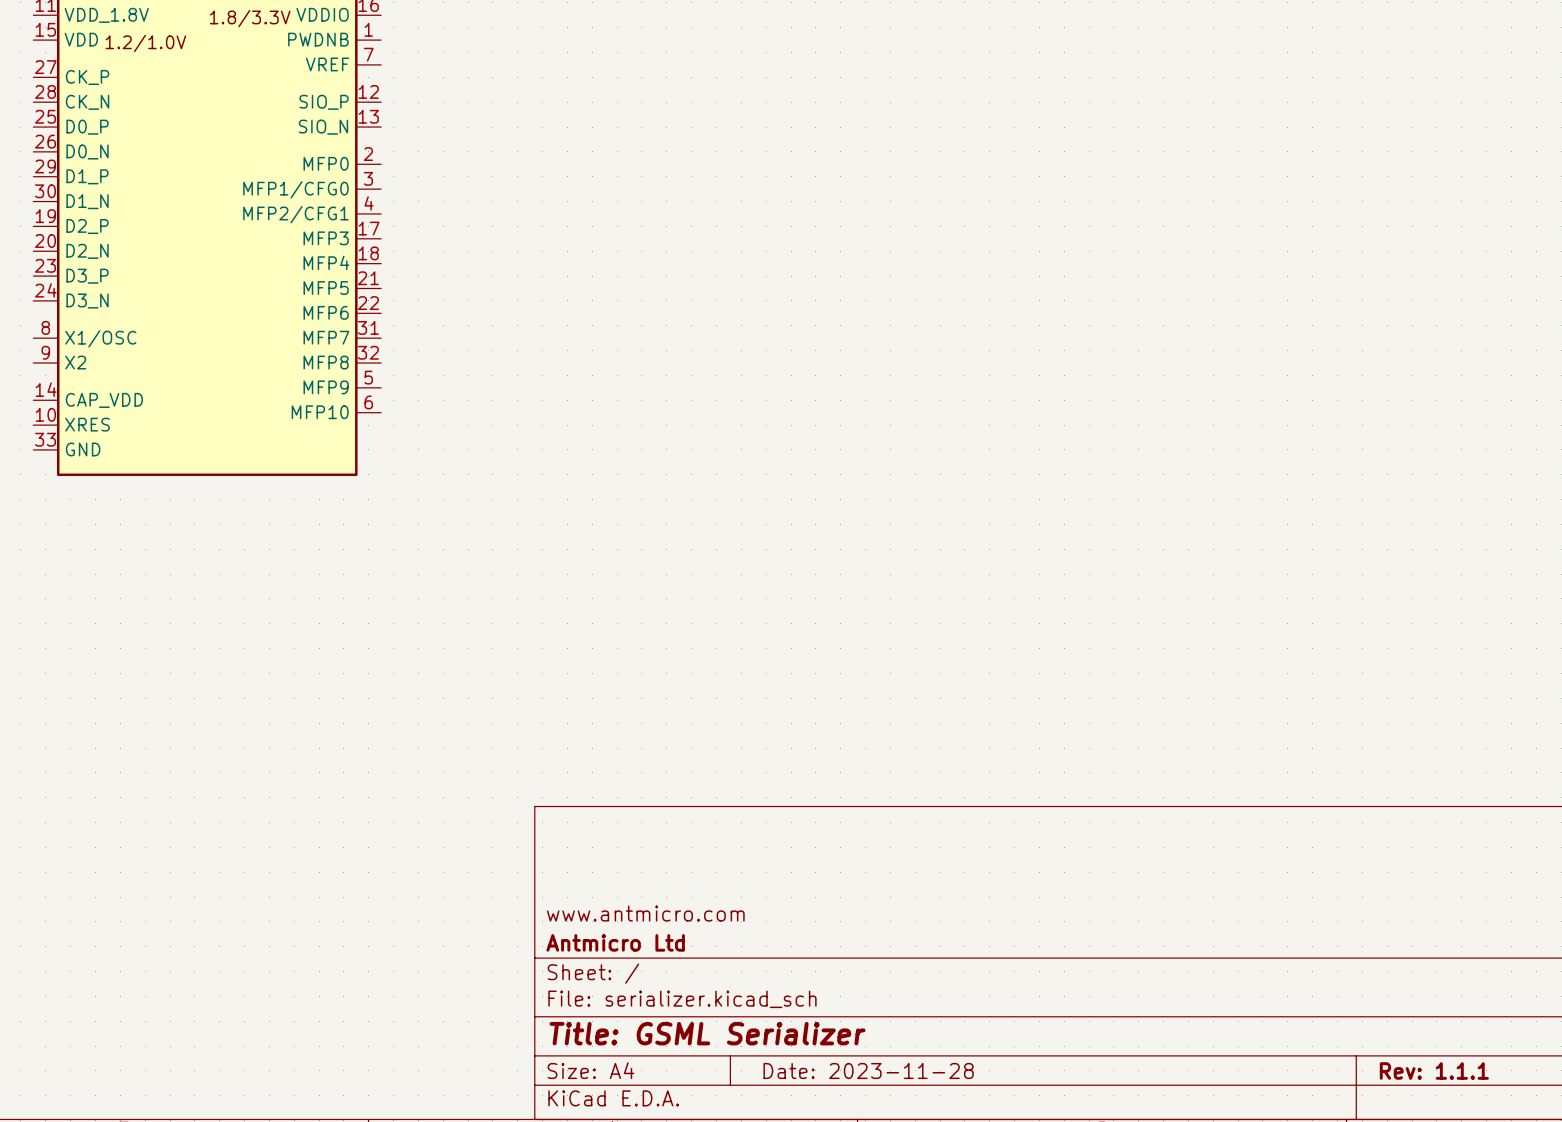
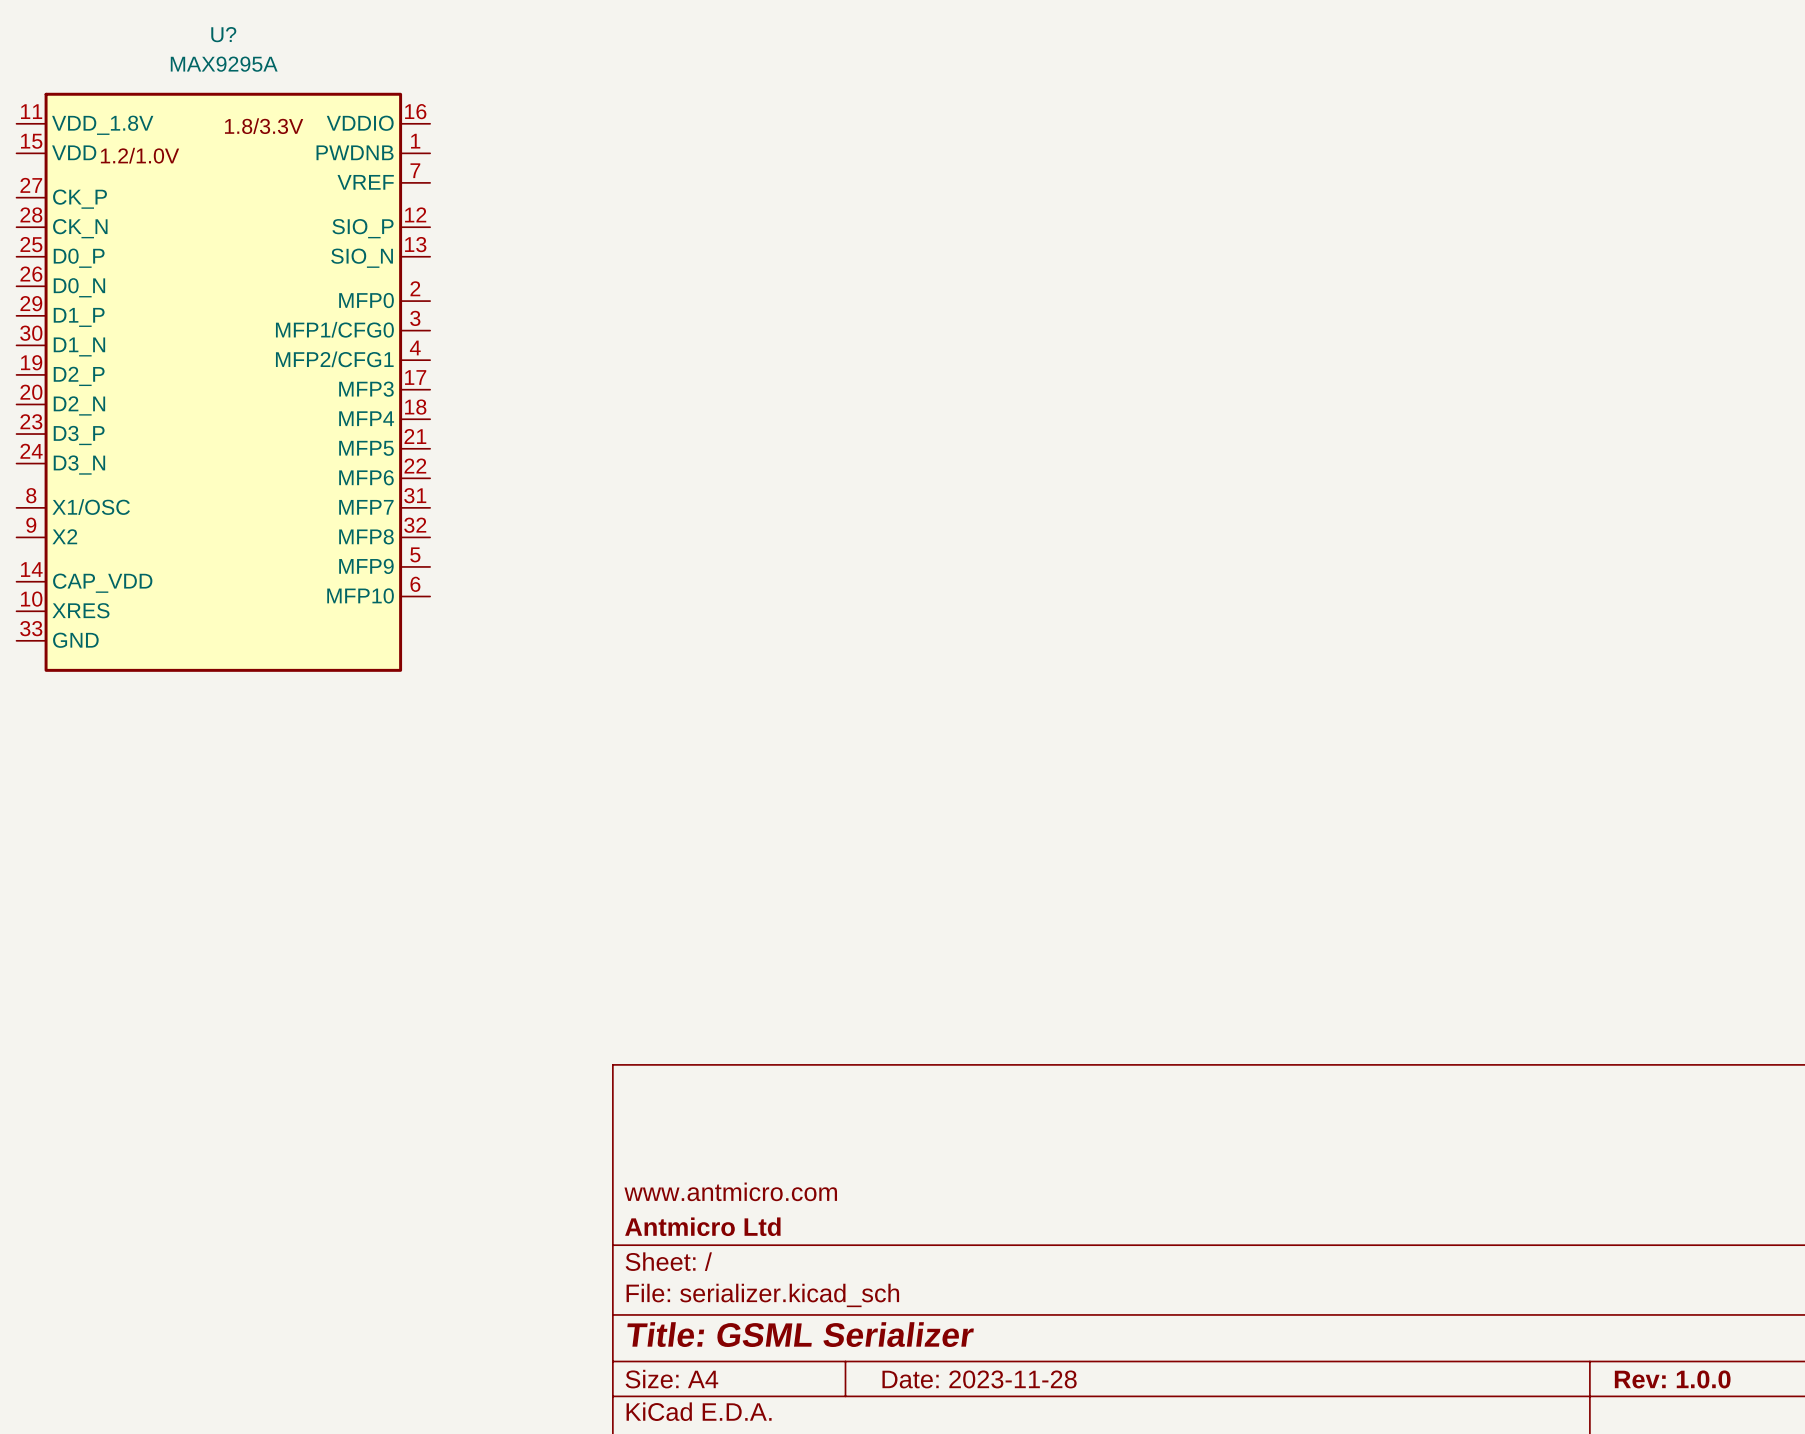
title block: Rev: 1.1.1 (1434, 1071) -> Rev: 1.0.0 (1672, 1379)

